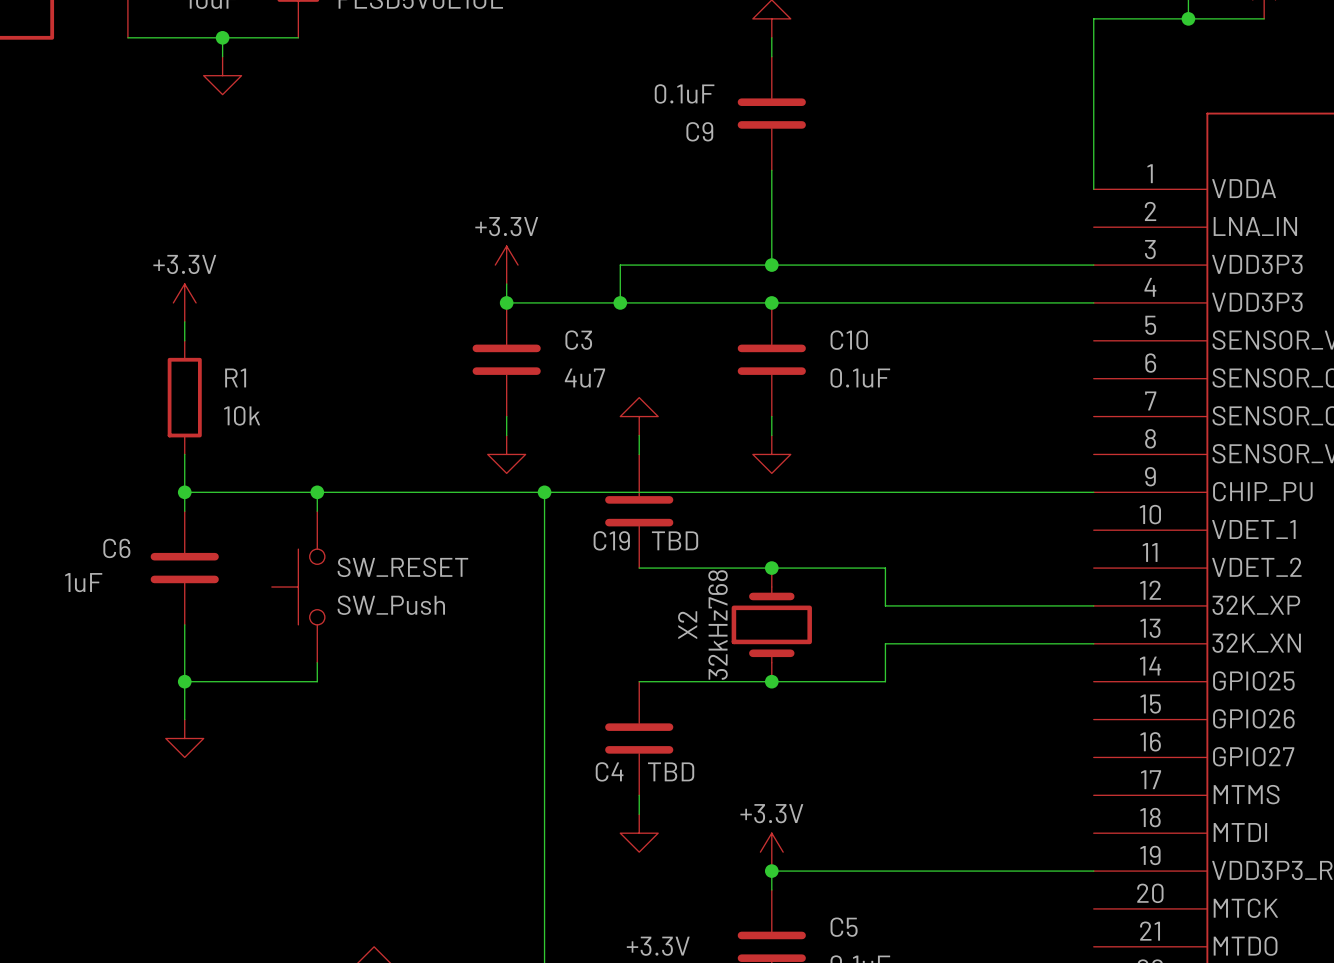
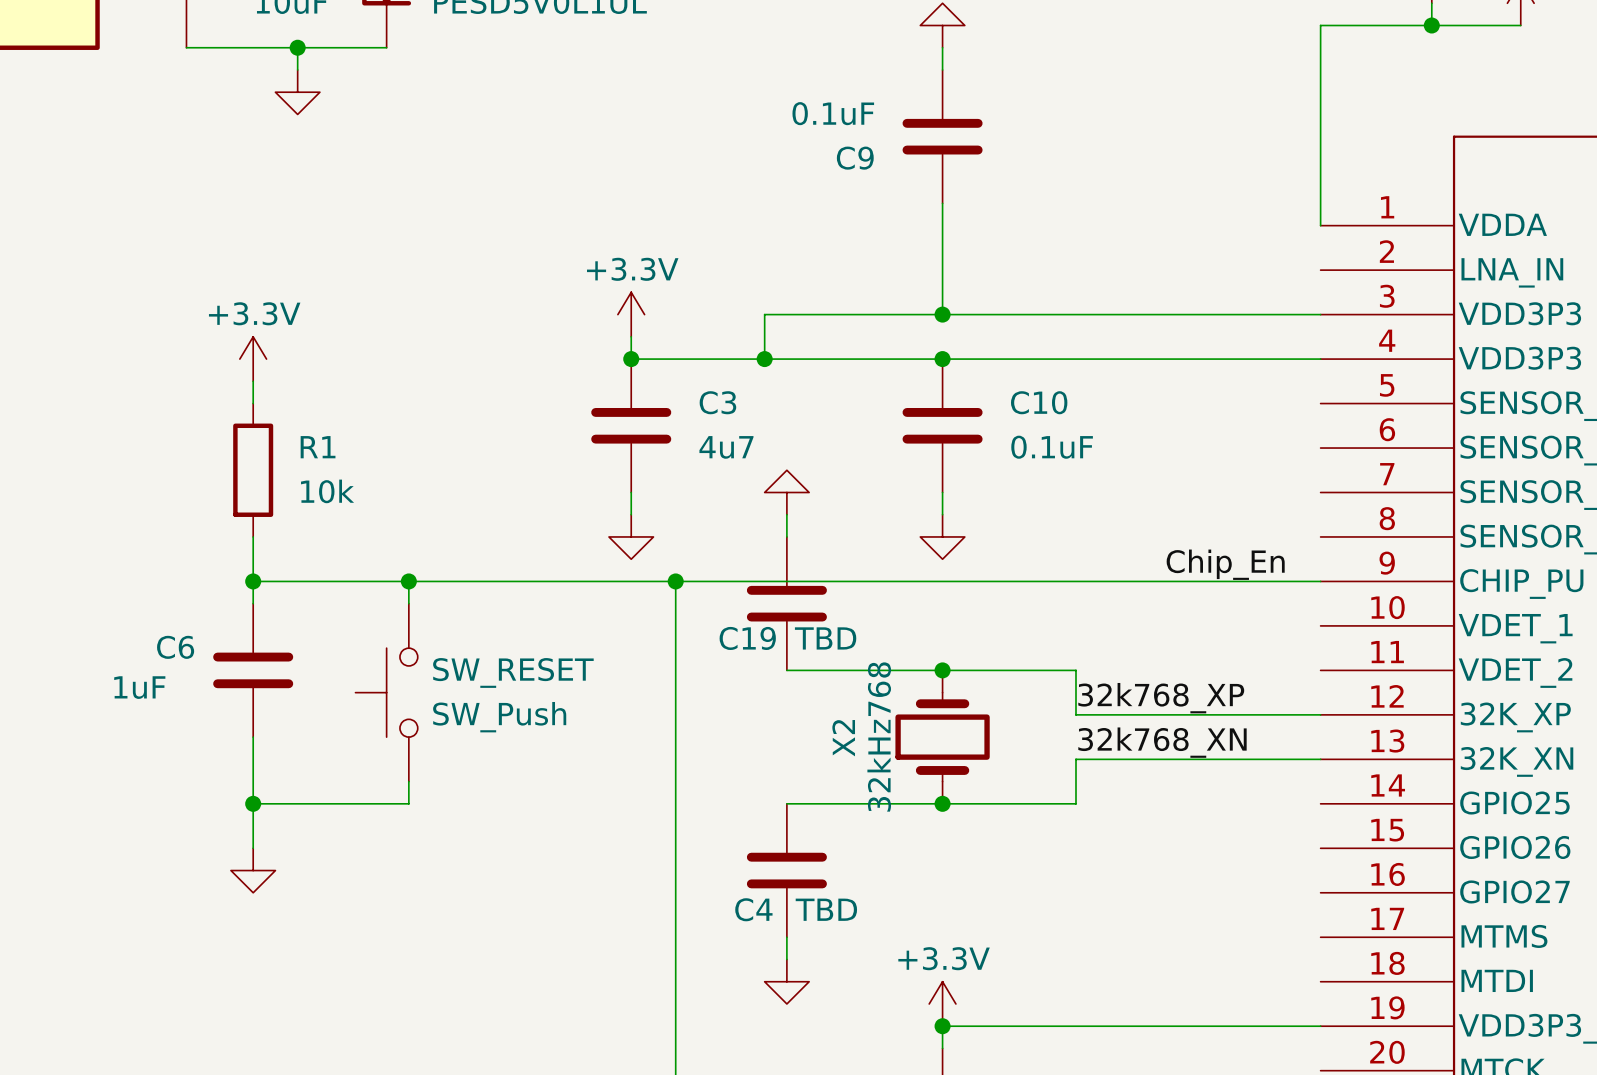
label: none -> Chip_En (1225, 564)
label: none -> 32k768_XP (1161, 698)
label: none -> 32k768_XN (1162, 742)

